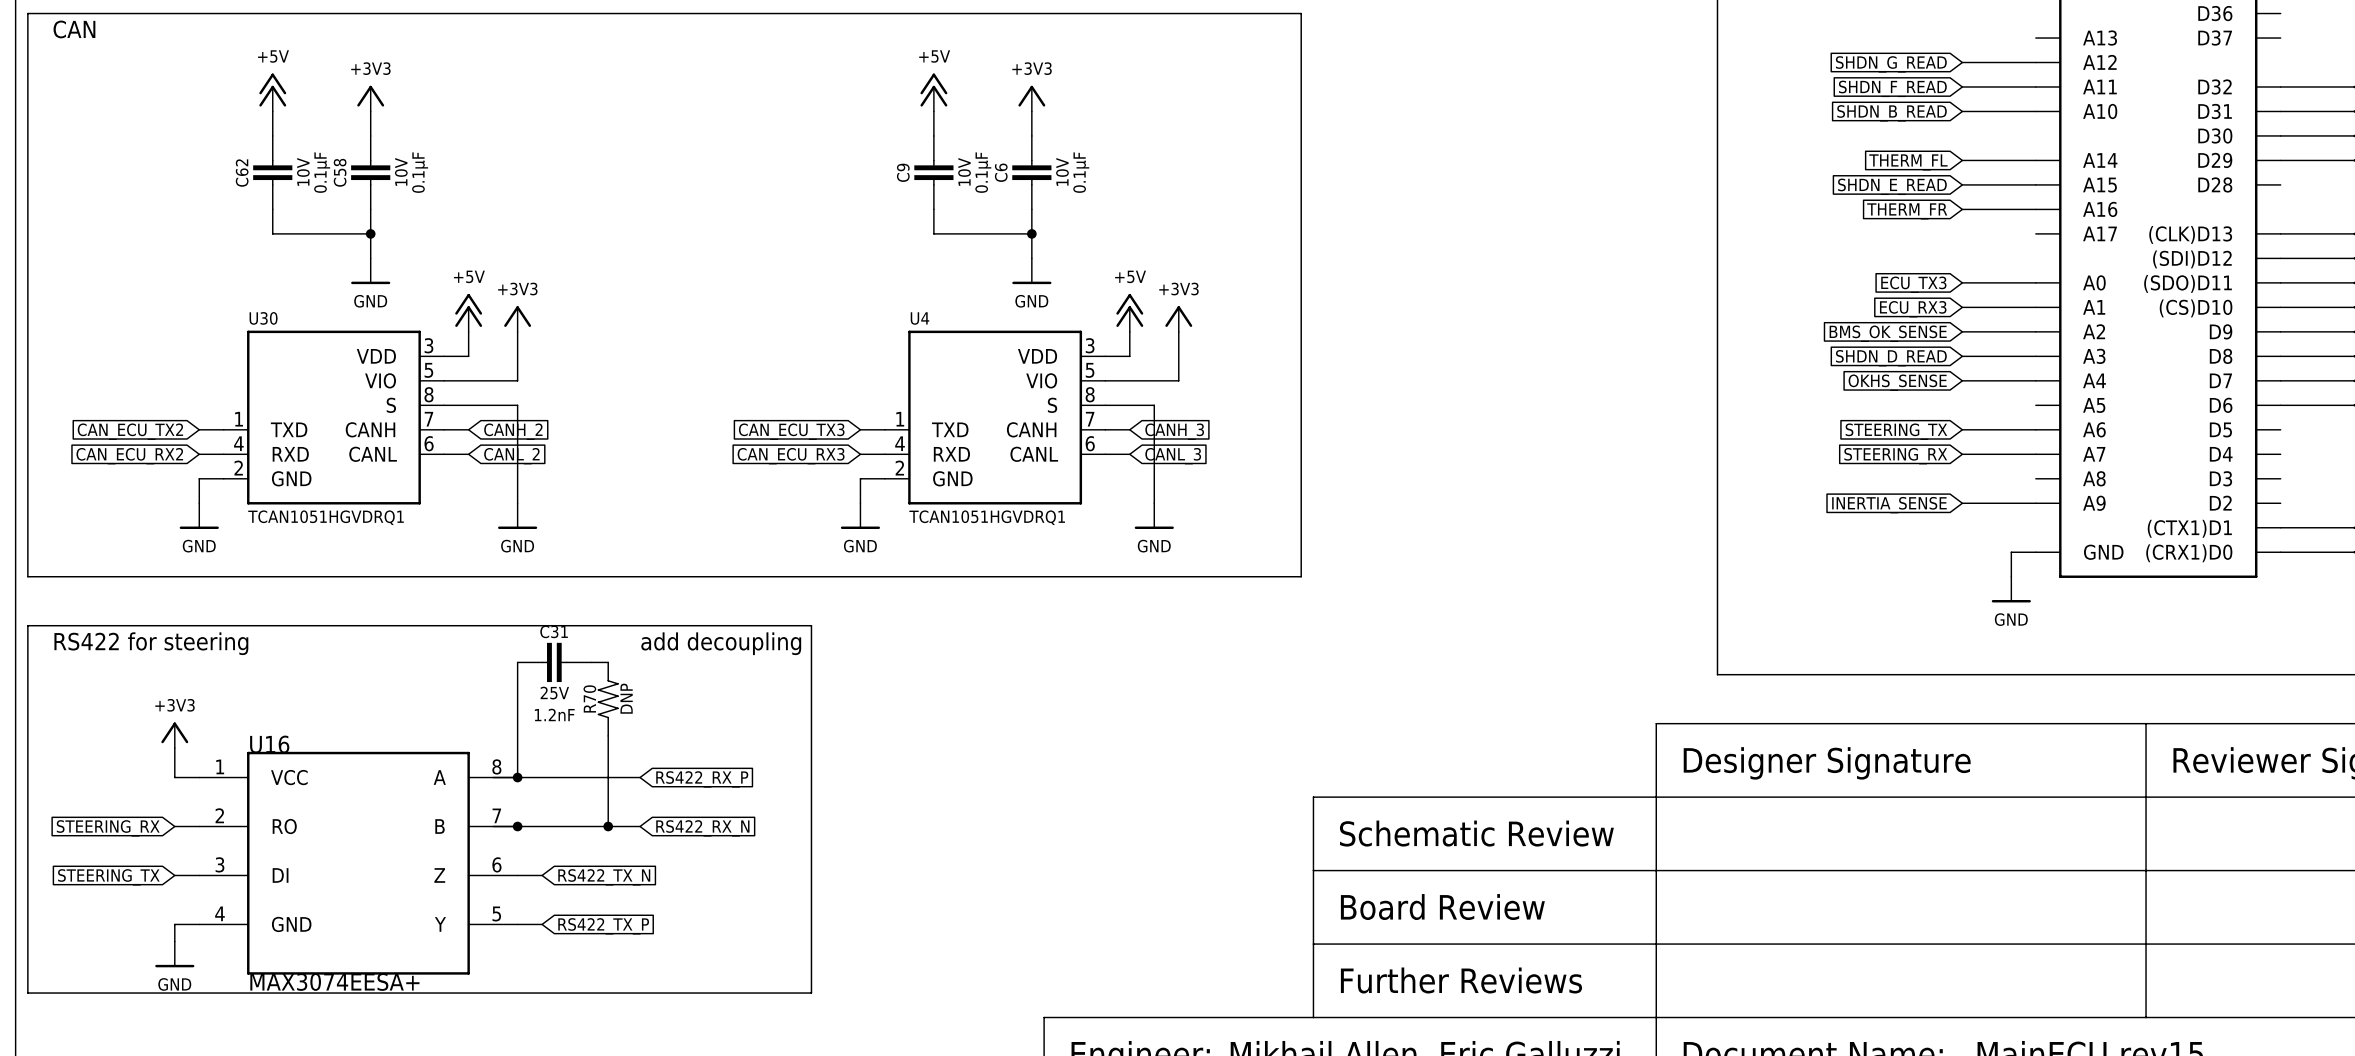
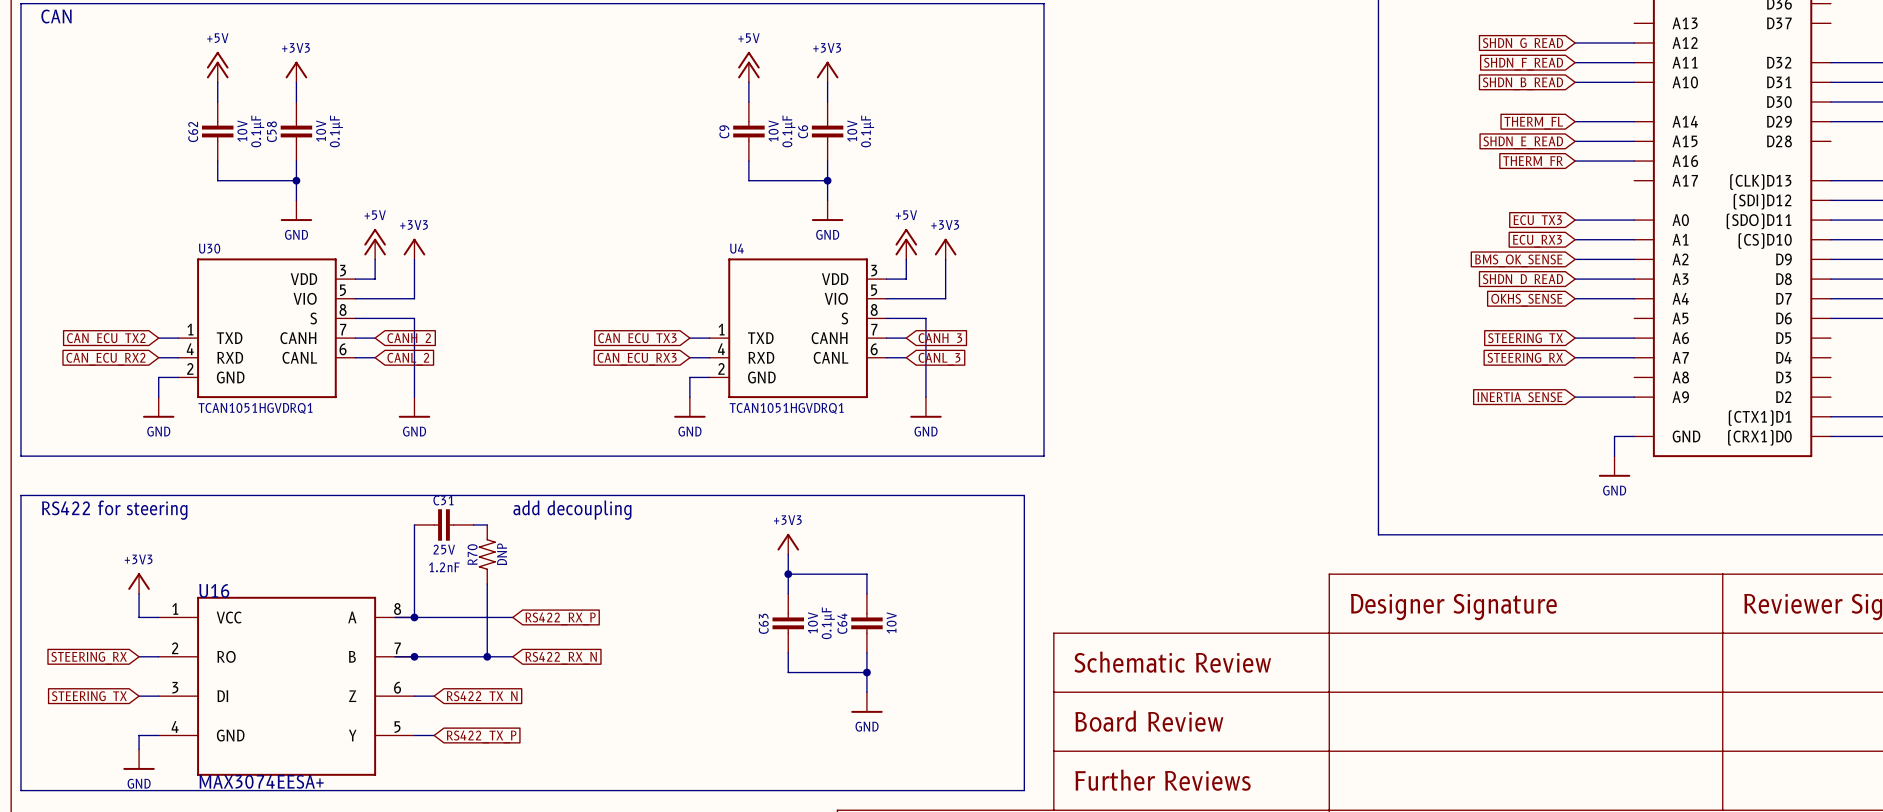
line: (811, 625) (811, 993) -> (650, 495) (1024, 495) (1024, 790) (650, 790)
power symbol: none -> +3V3 (788, 544)
wire: none -> (788, 554) (788, 593)
wire: none -> (788, 574) (866, 574) (866, 593)
junction: none -> (788, 574)
C63: none -> (788, 623)
C64: none -> (866, 623)
wire: none -> (788, 652) (788, 672) (866, 672)
wire: none -> (866, 652) (866, 692)
junction: none -> (866, 672)
power symbol: none -> GND (866, 702)

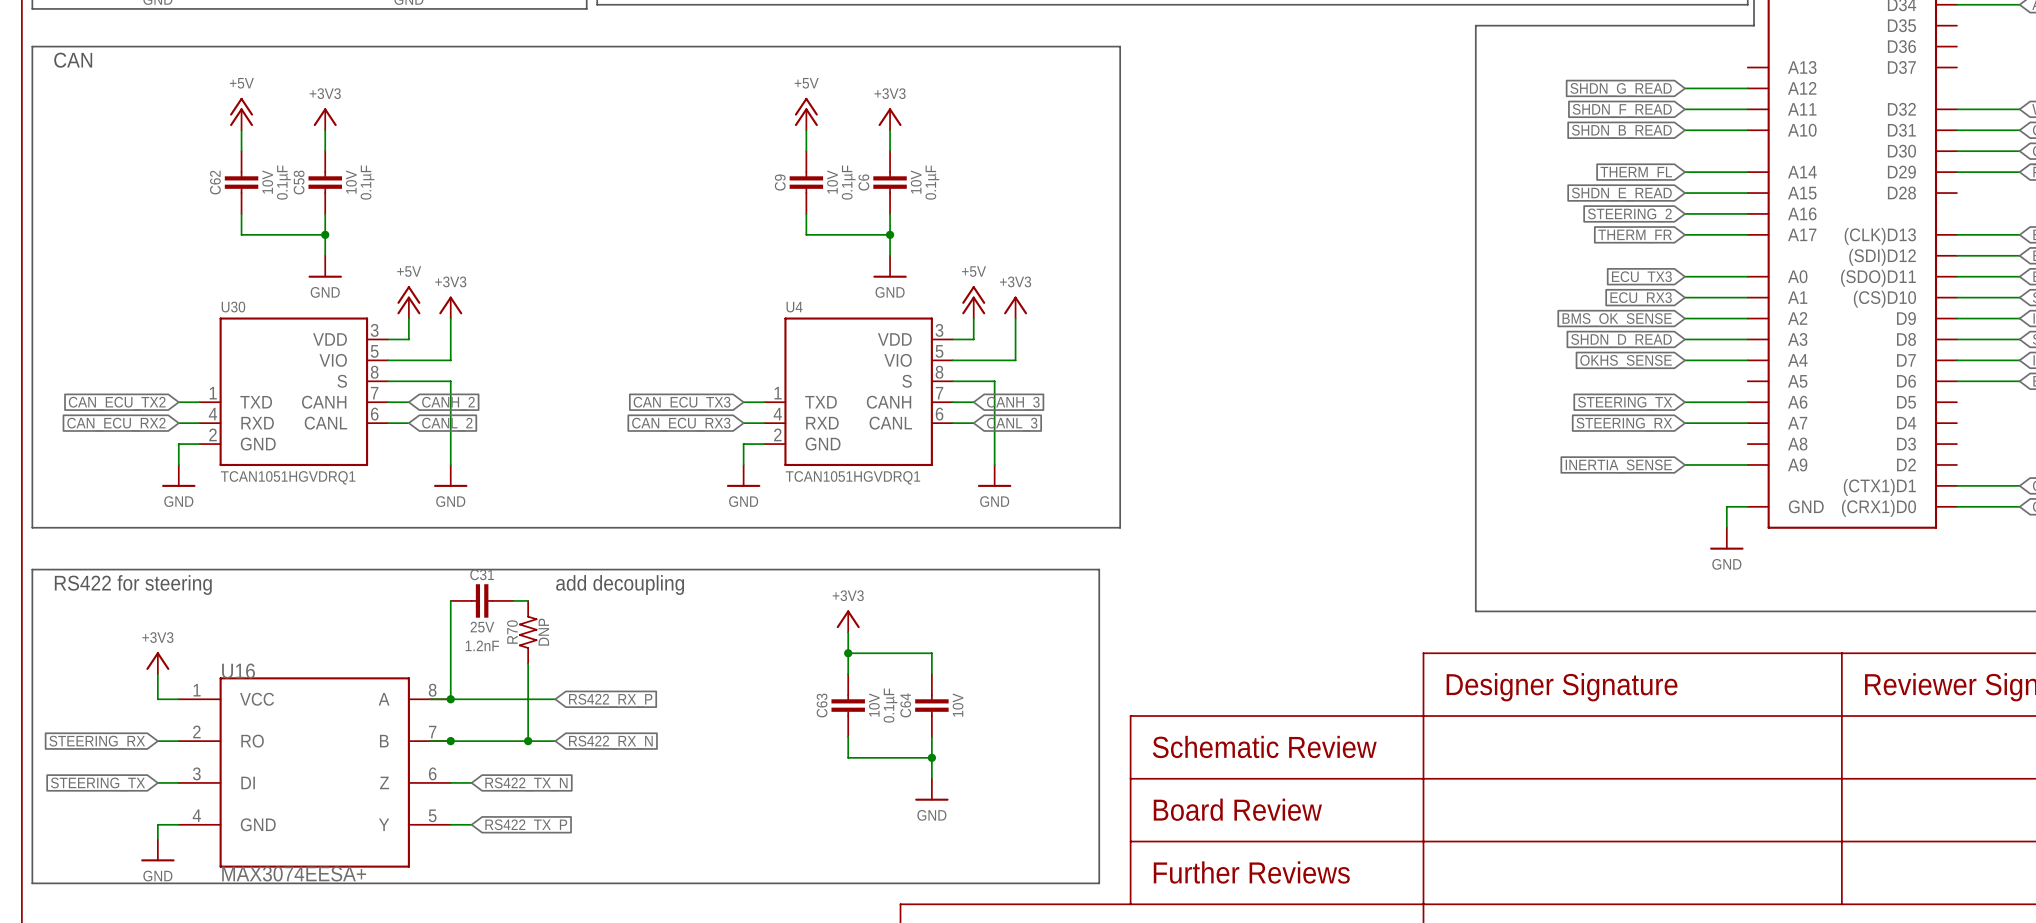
global label: THERM_FR (1533, 162) -> STEERING_2 (1629, 215)
wire: none -> (1684, 234) (1747, 234)
global label: none -> THERM_FR (1635, 236)

